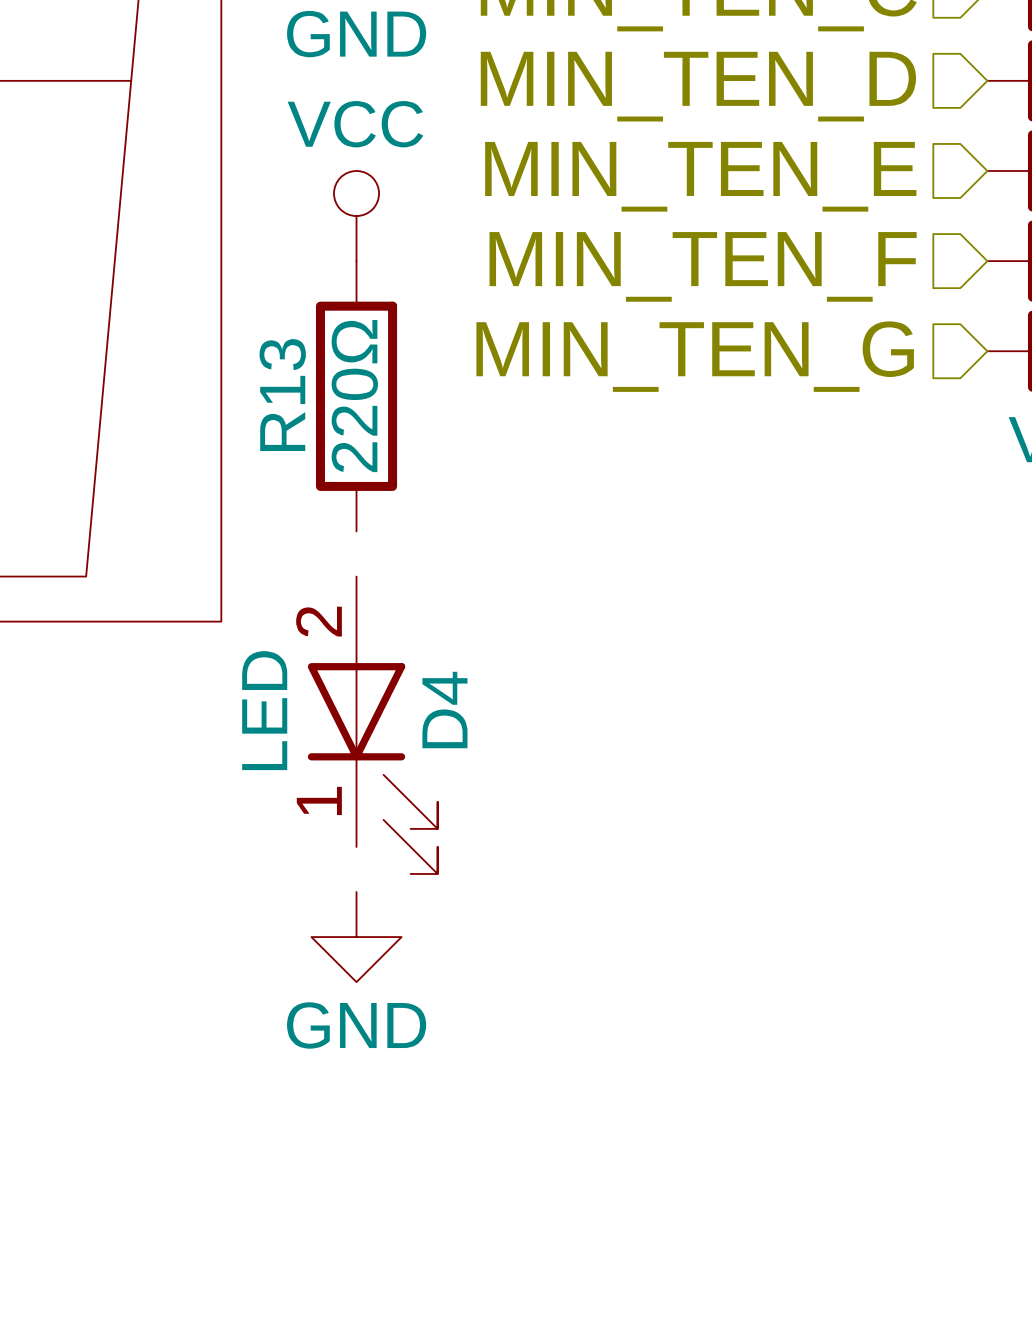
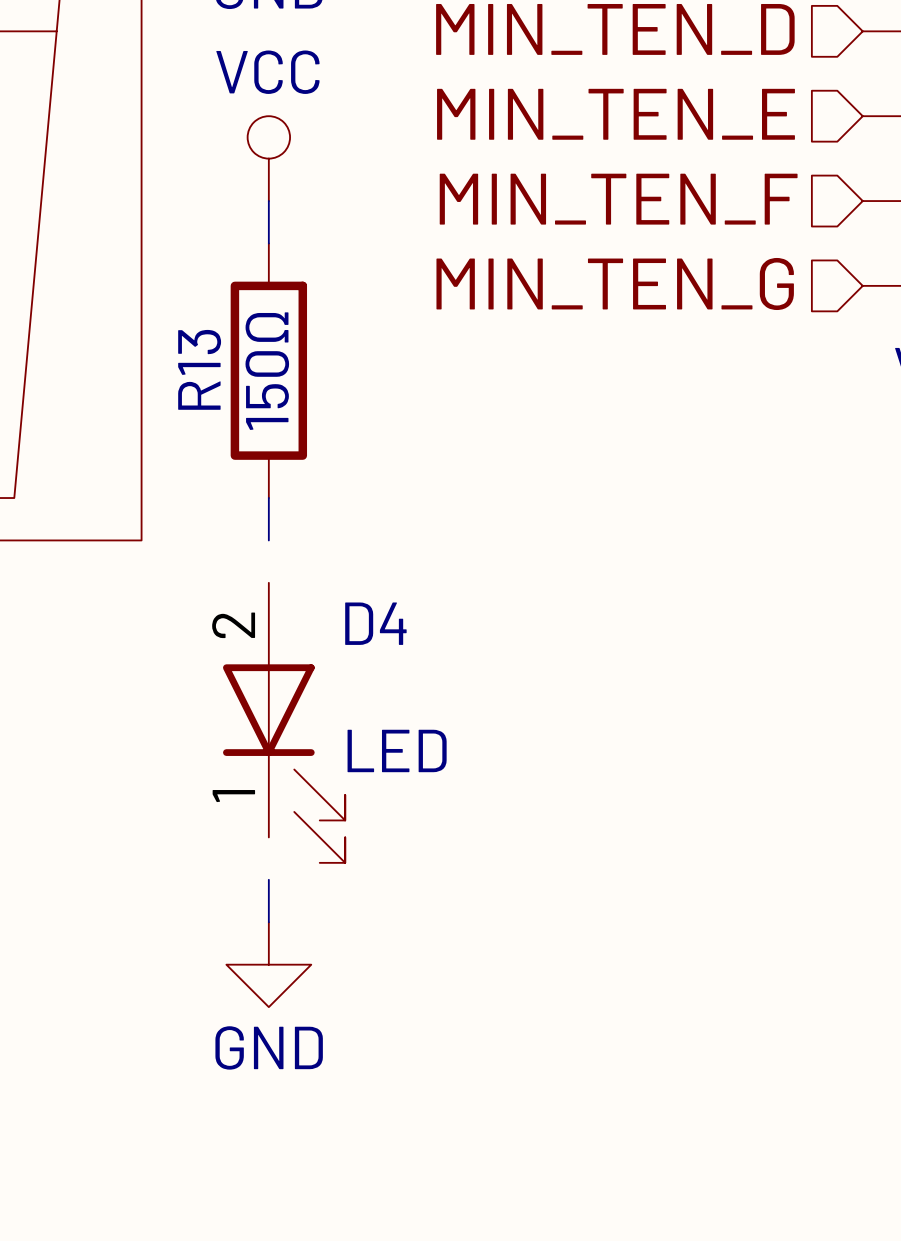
R13 value: 220Ω (354, 396) -> 150Ω (267, 371)
R13 position: (356, 396) -> (268, 370)
D4 value rotation: 0° (264, 710) -> 90° clockwise (397, 750)
D4 value position: LED (264, 710) -> LED (397, 750)
D4 name rotation: 0° (444, 710) -> 90° clockwise (375, 623)
D4 position: (372, 725) -> (284, 722)
power symbol position: GND (356, 937) -> GND (268, 964)
wire: none -> (268, 879) (268, 922)

